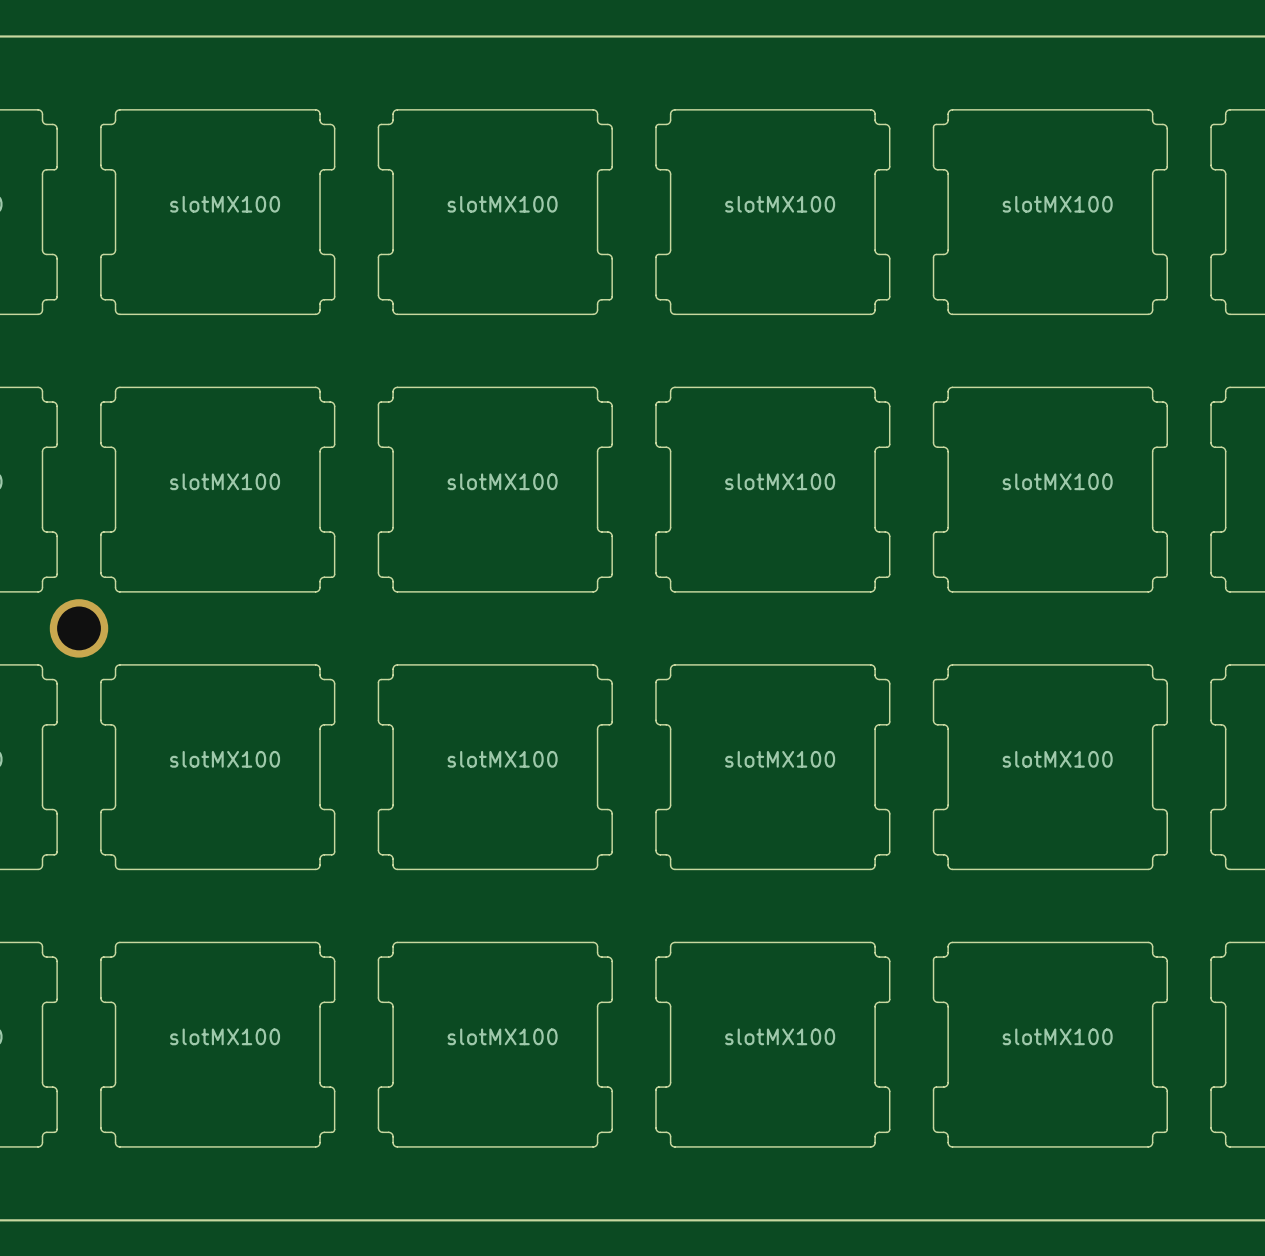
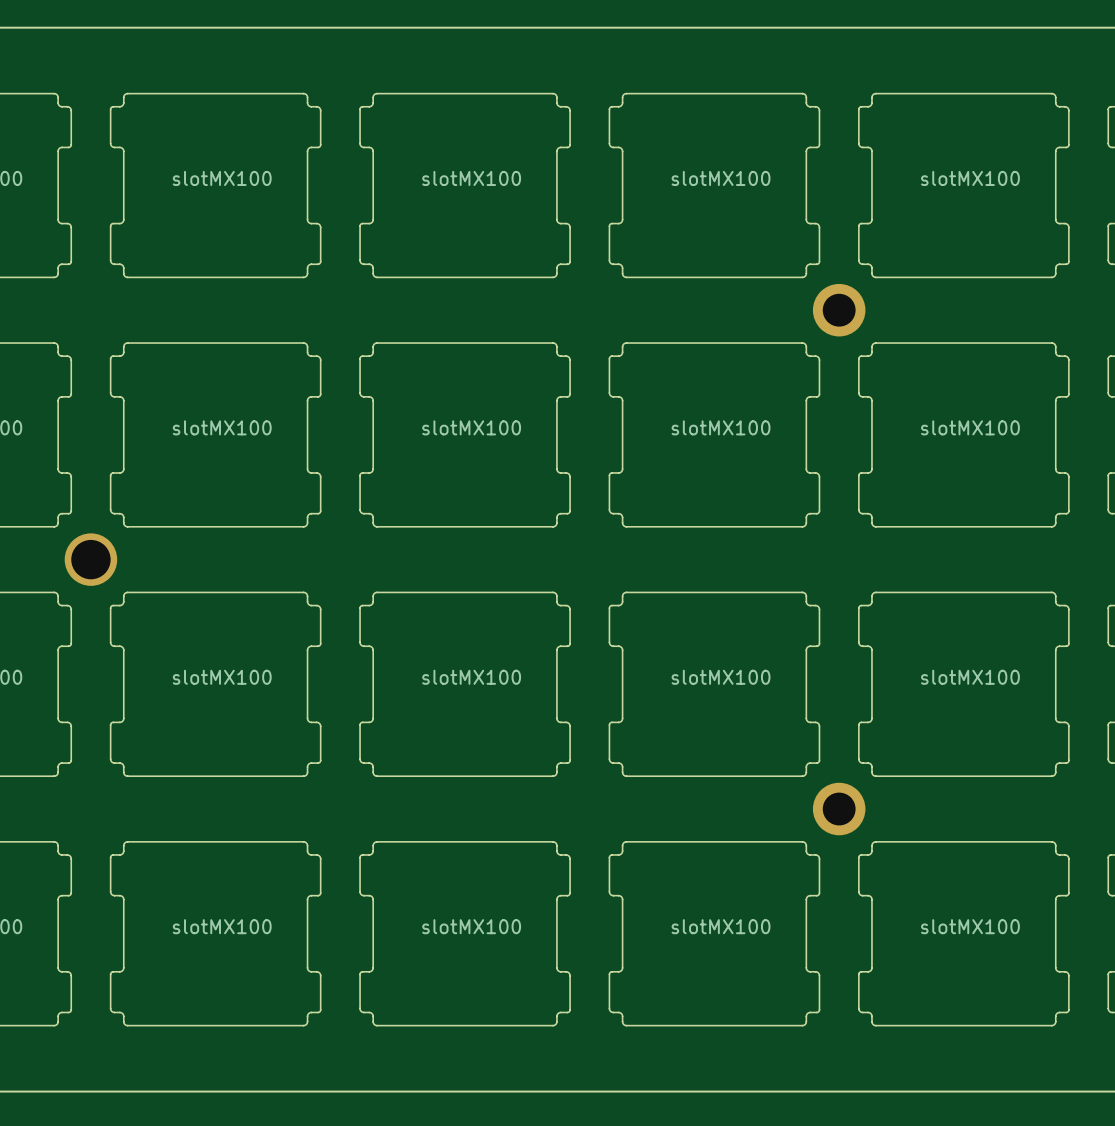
via: none -> (839, 310)
via: none -> (839, 809)

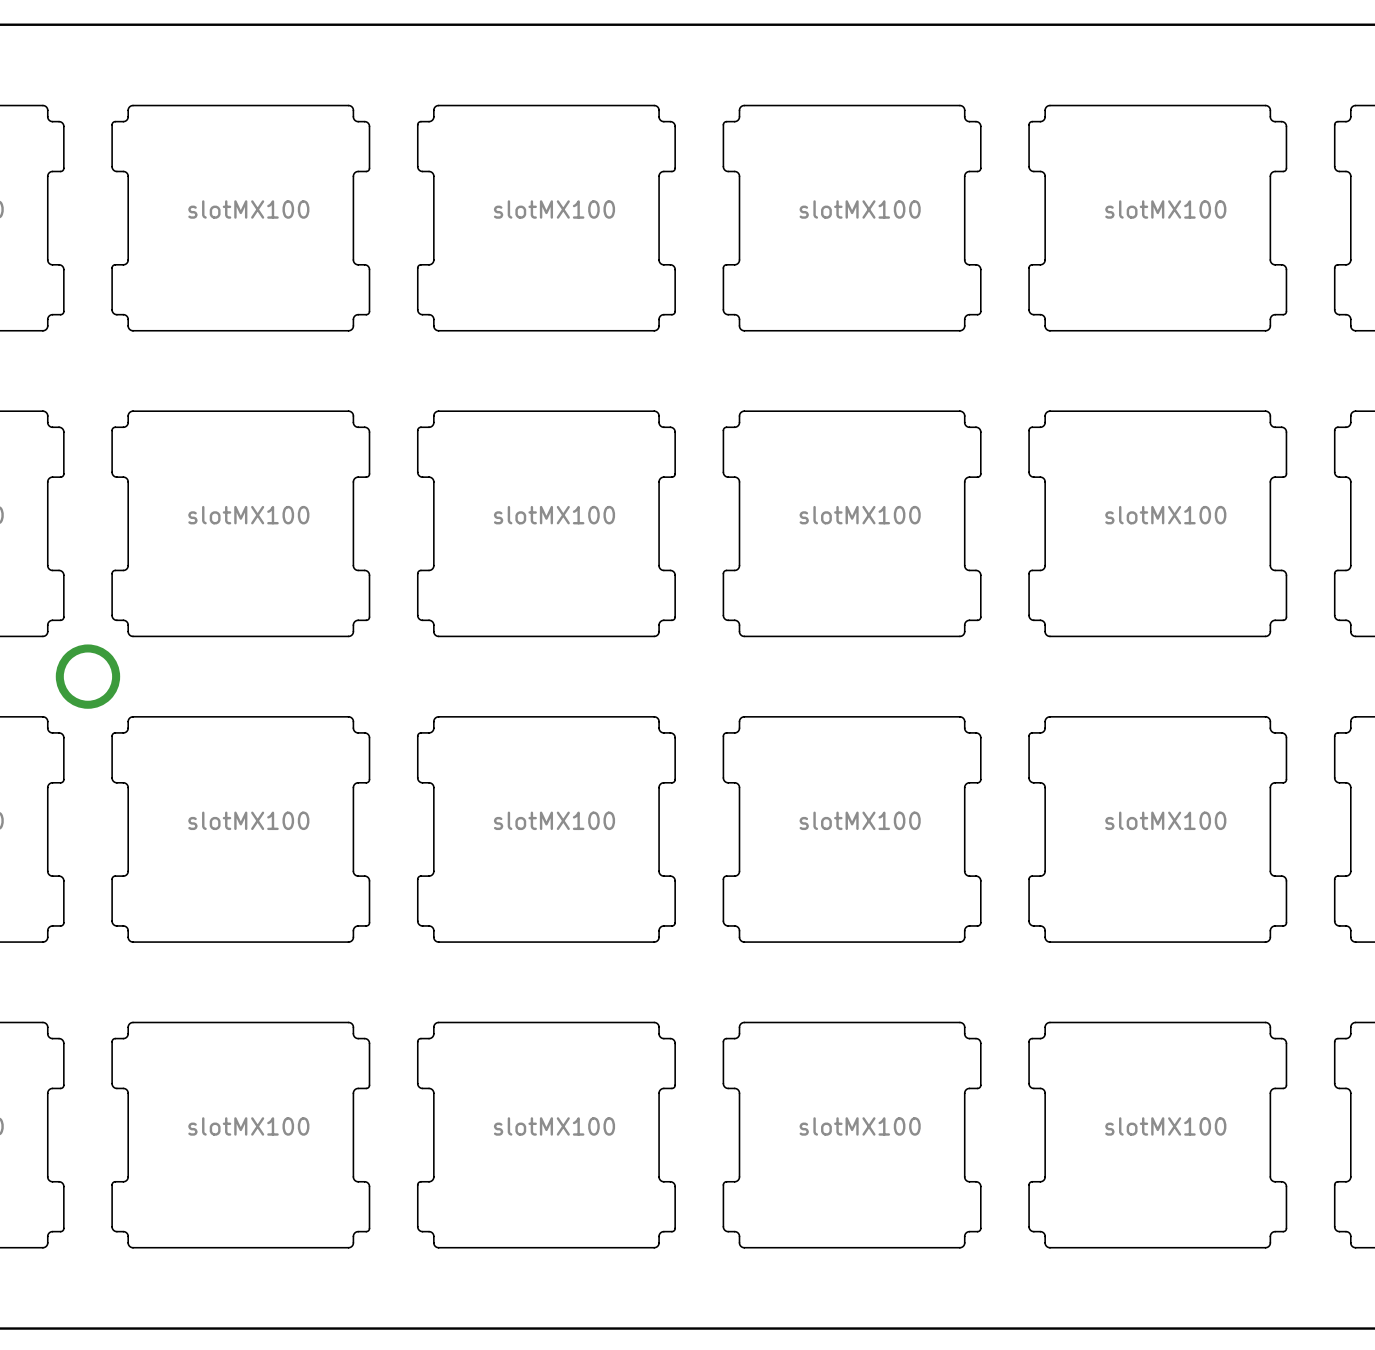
via: (839, 310) -> none
via: (839, 809) -> none

